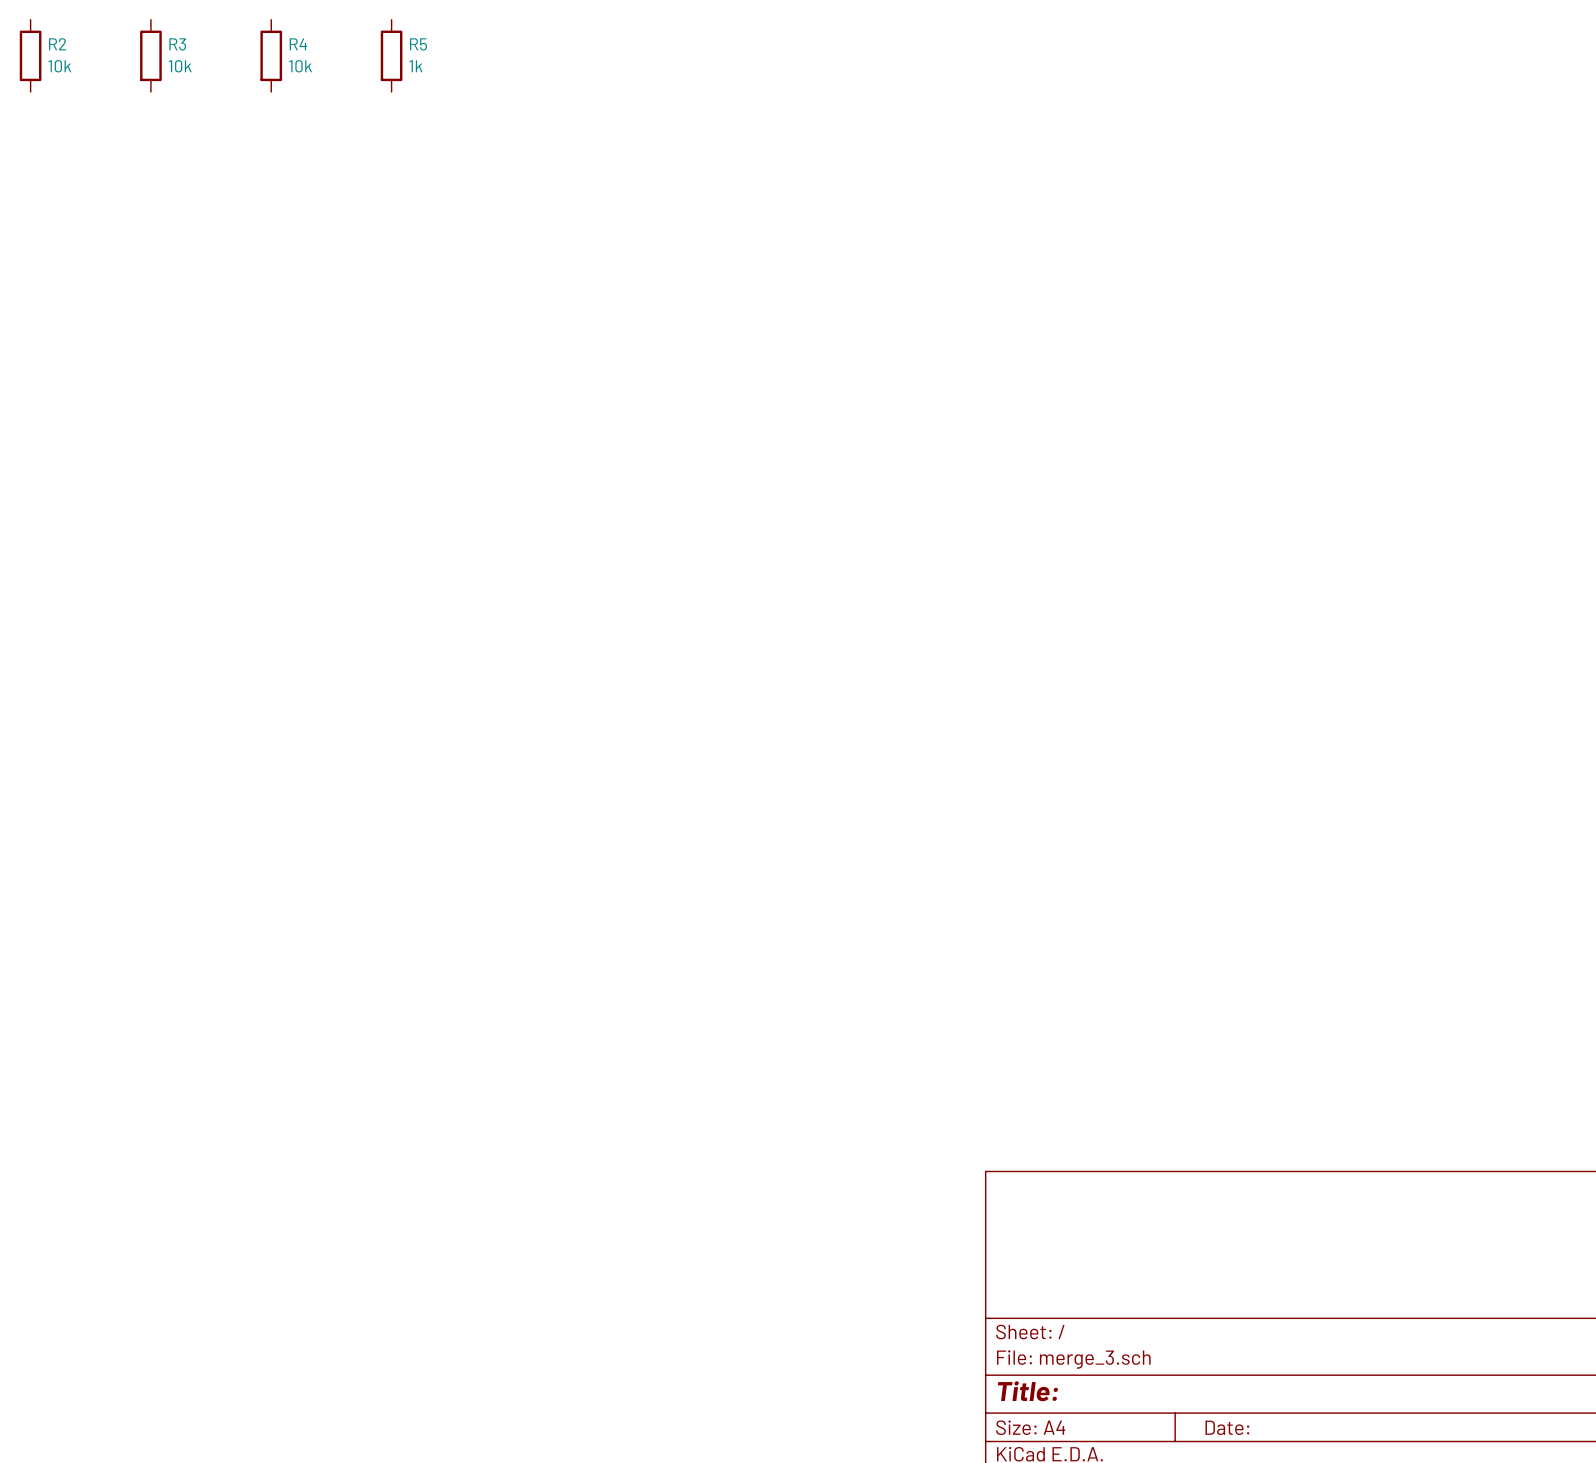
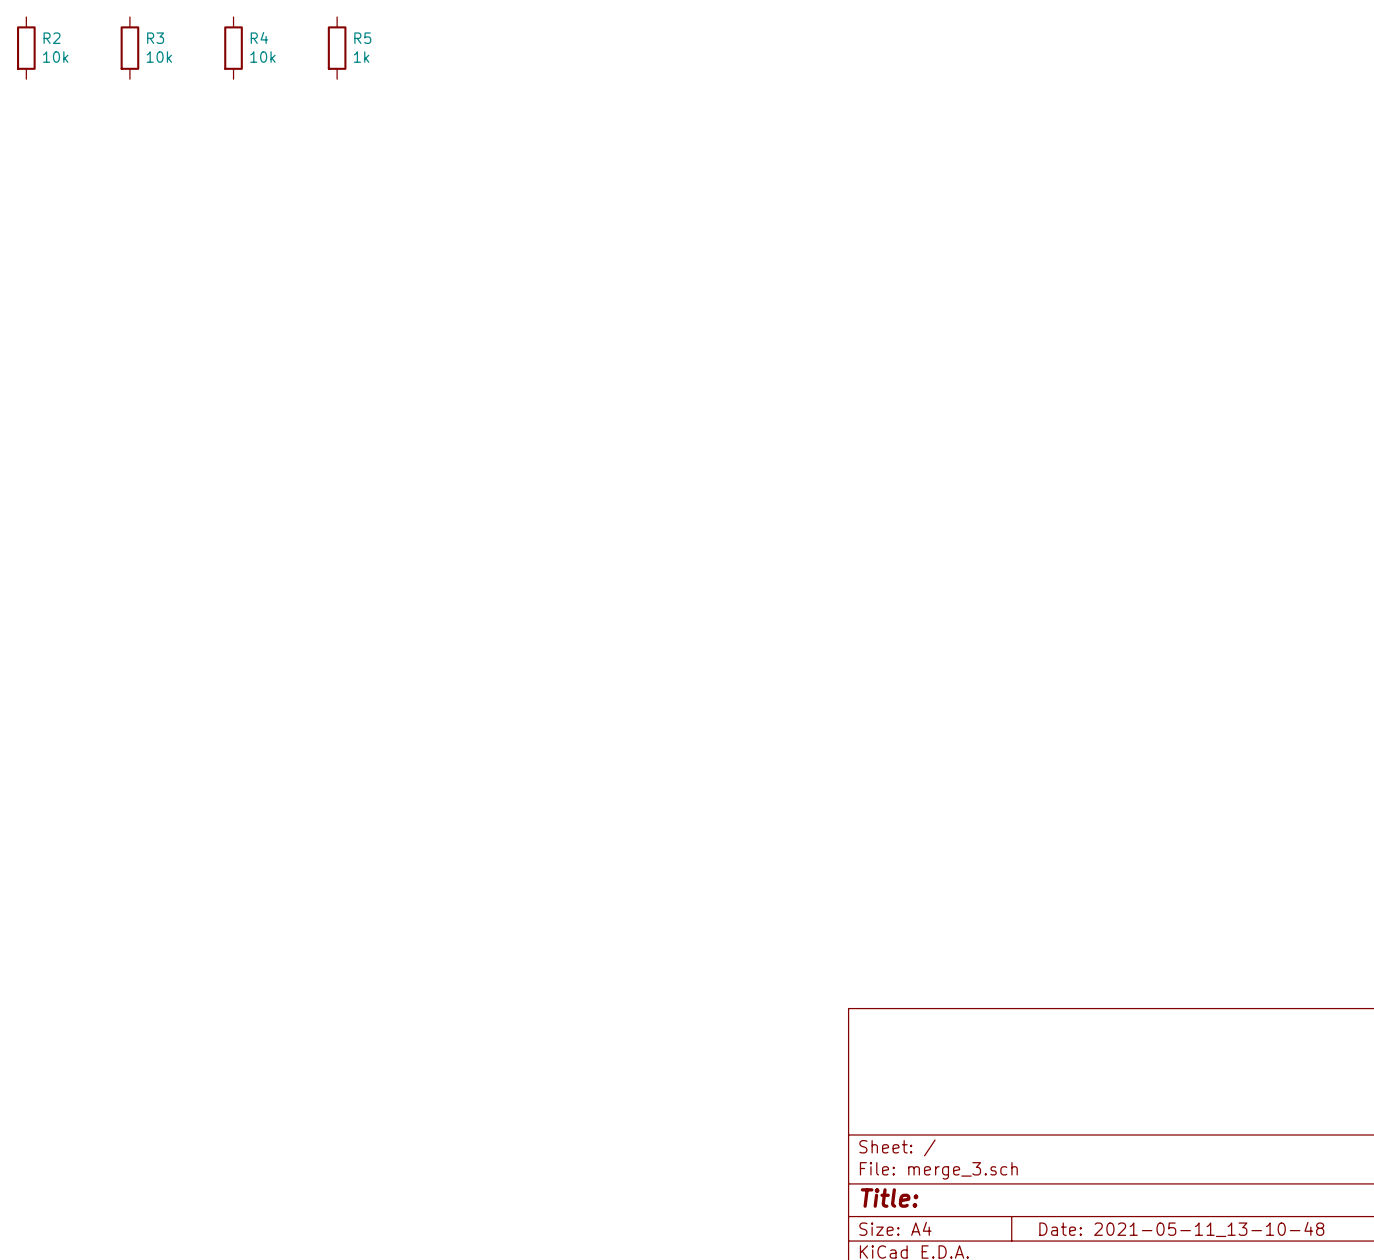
title block: Date: (1227, 1427) -> Date: 2021-05-11_13-10-48 (1181, 1229)

